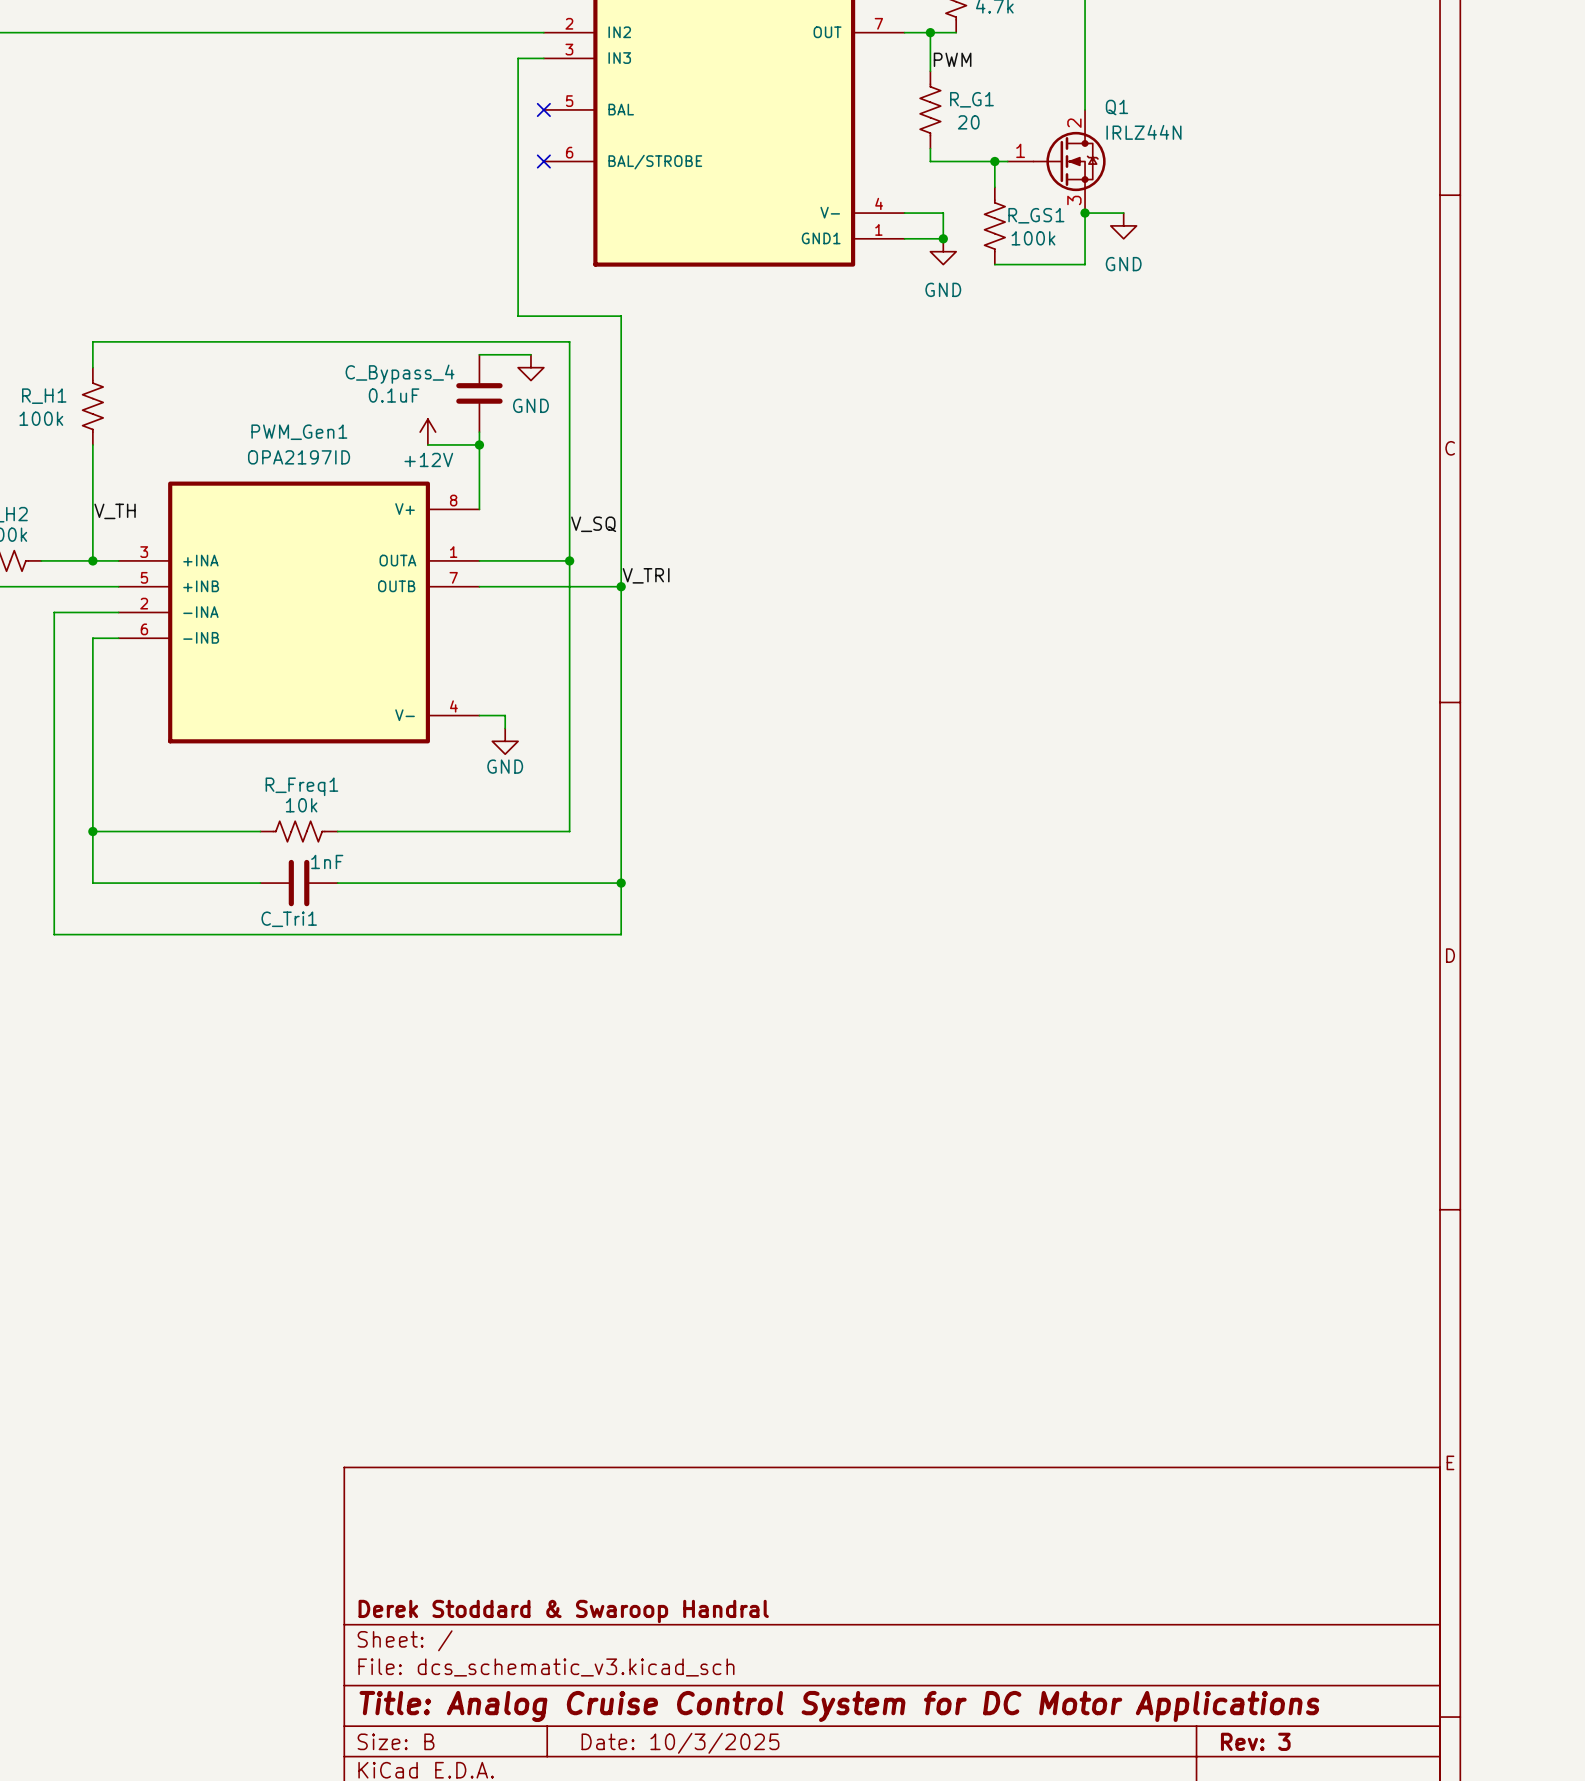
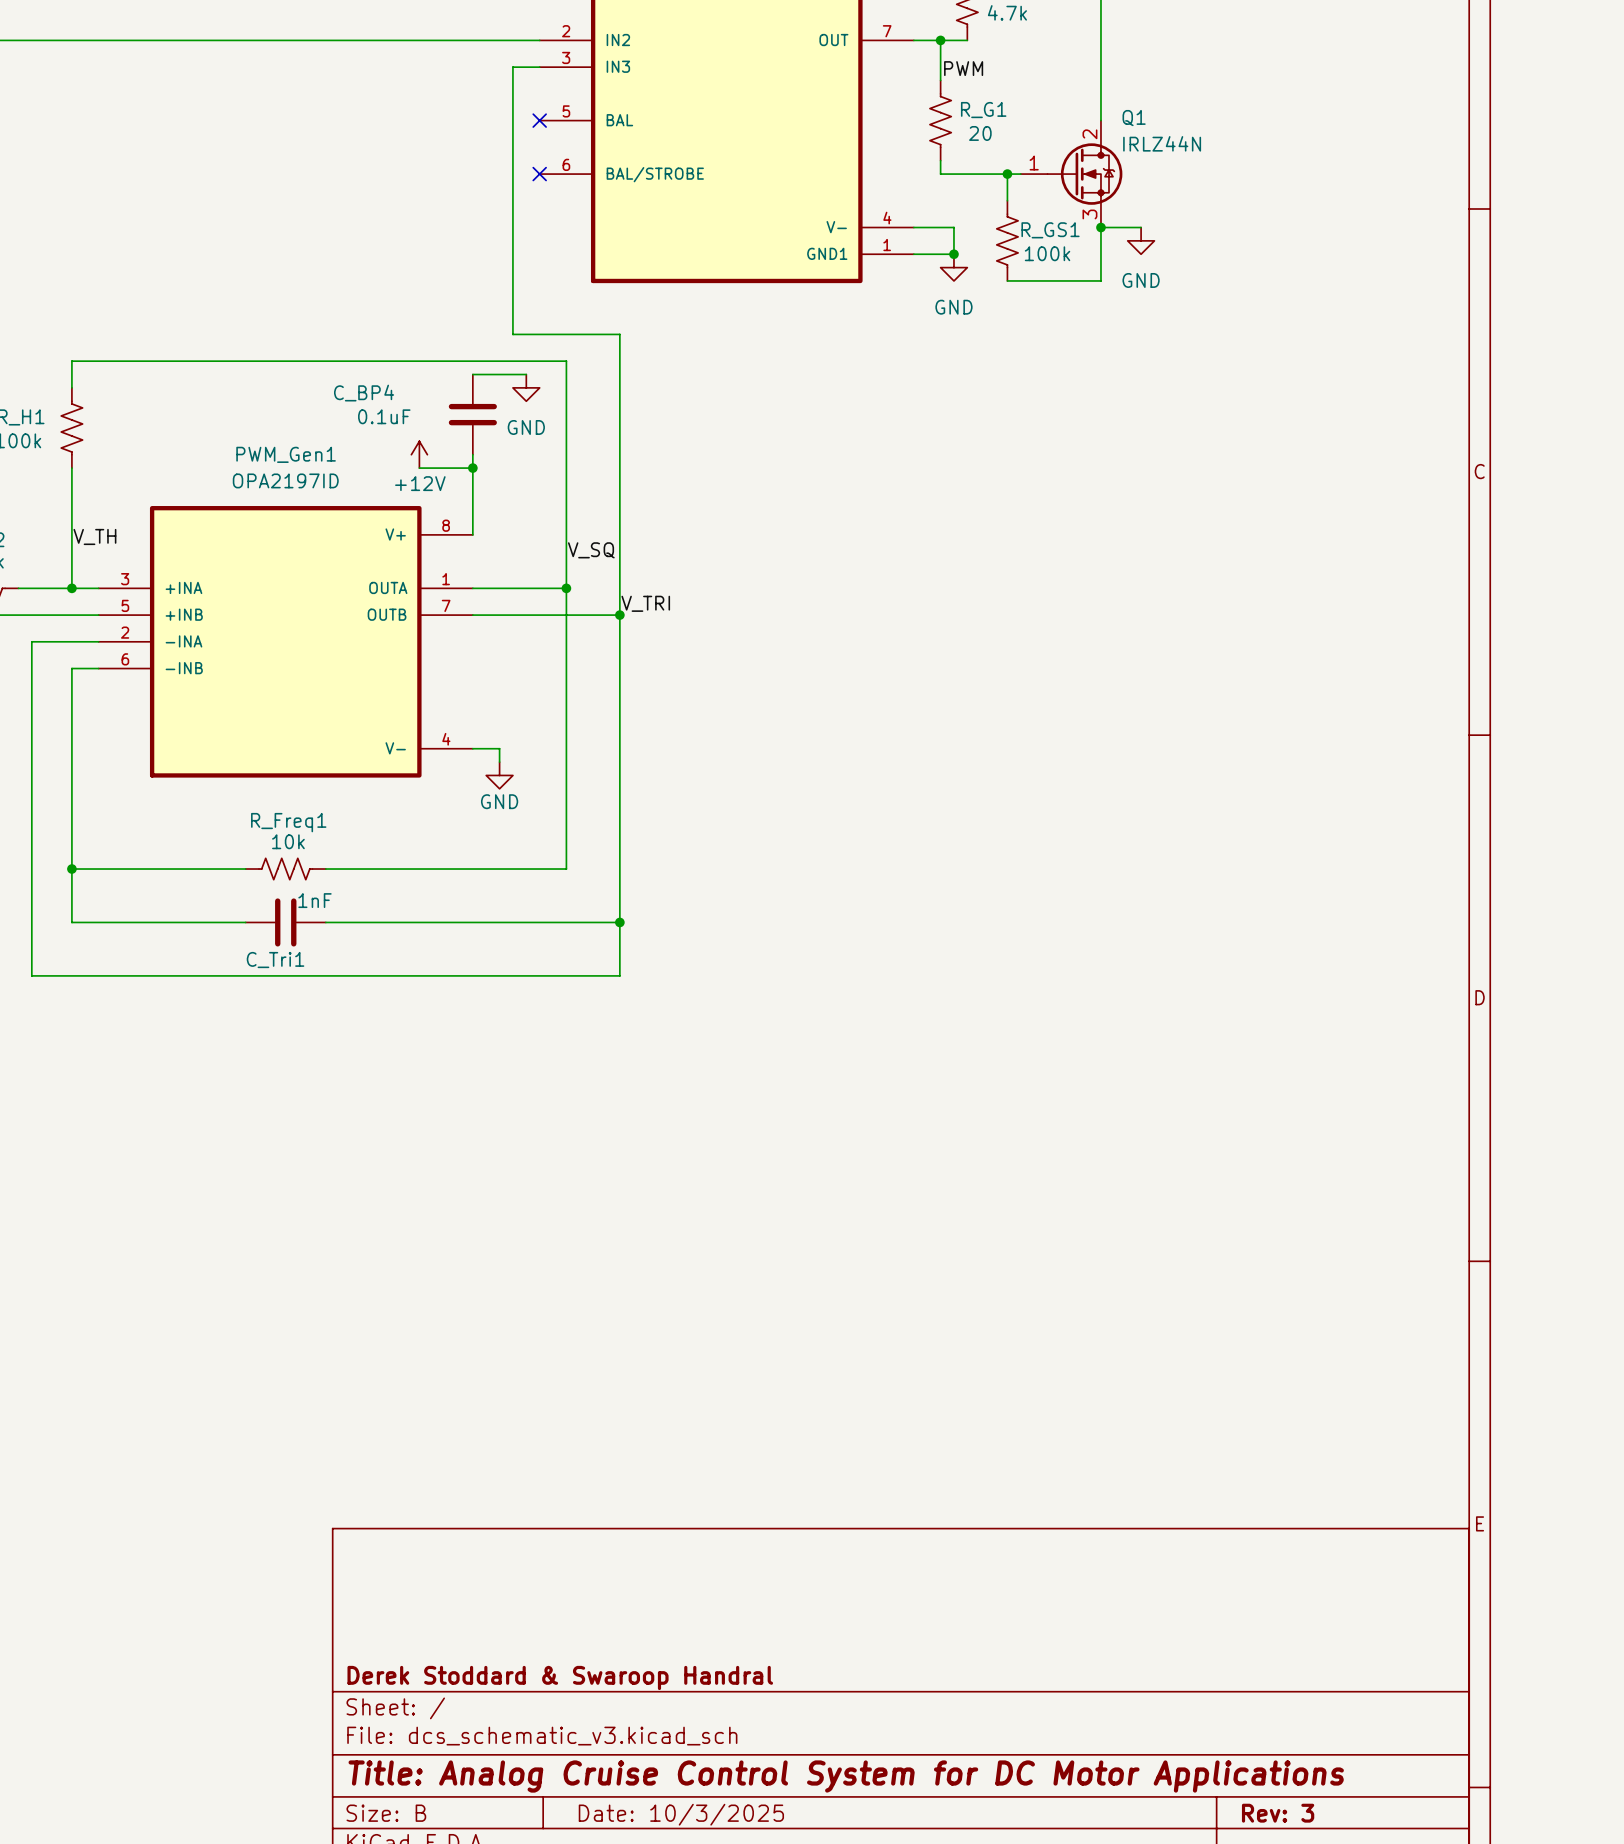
C_Bypass_4 name: C_Bypass_4 (400, 374) -> C_BP4 (364, 393)

